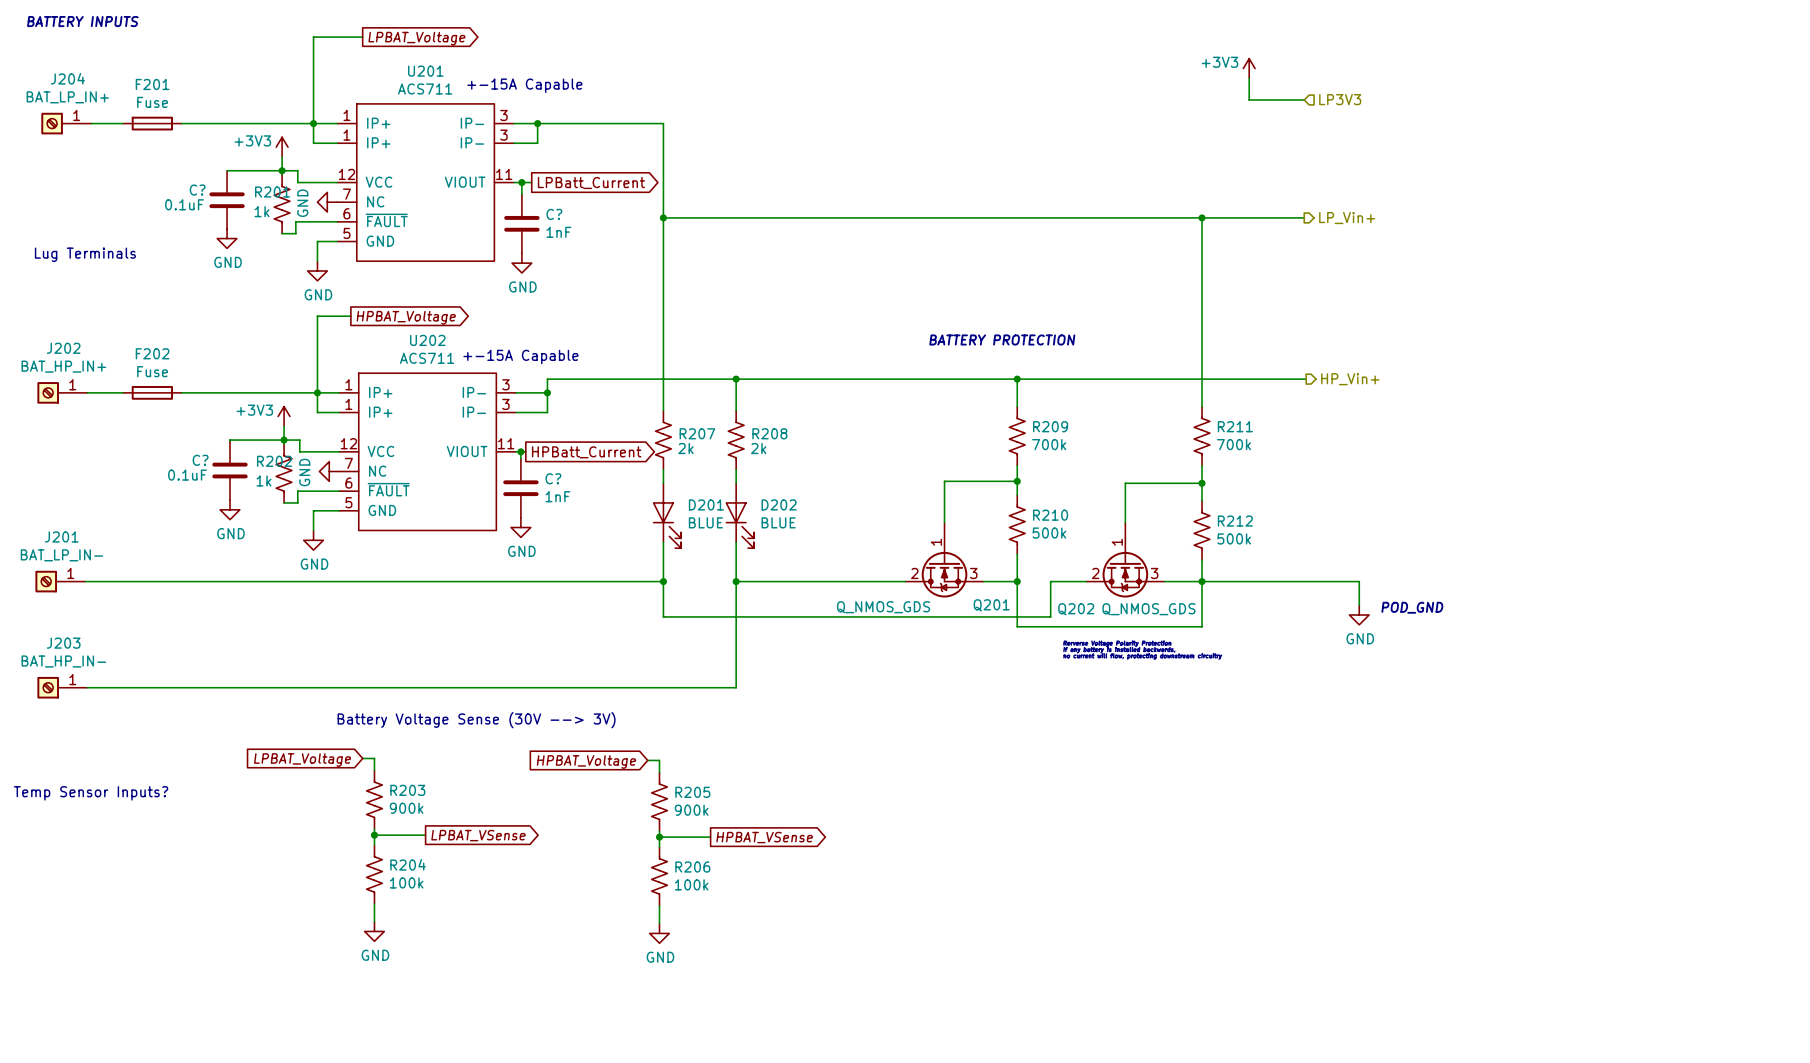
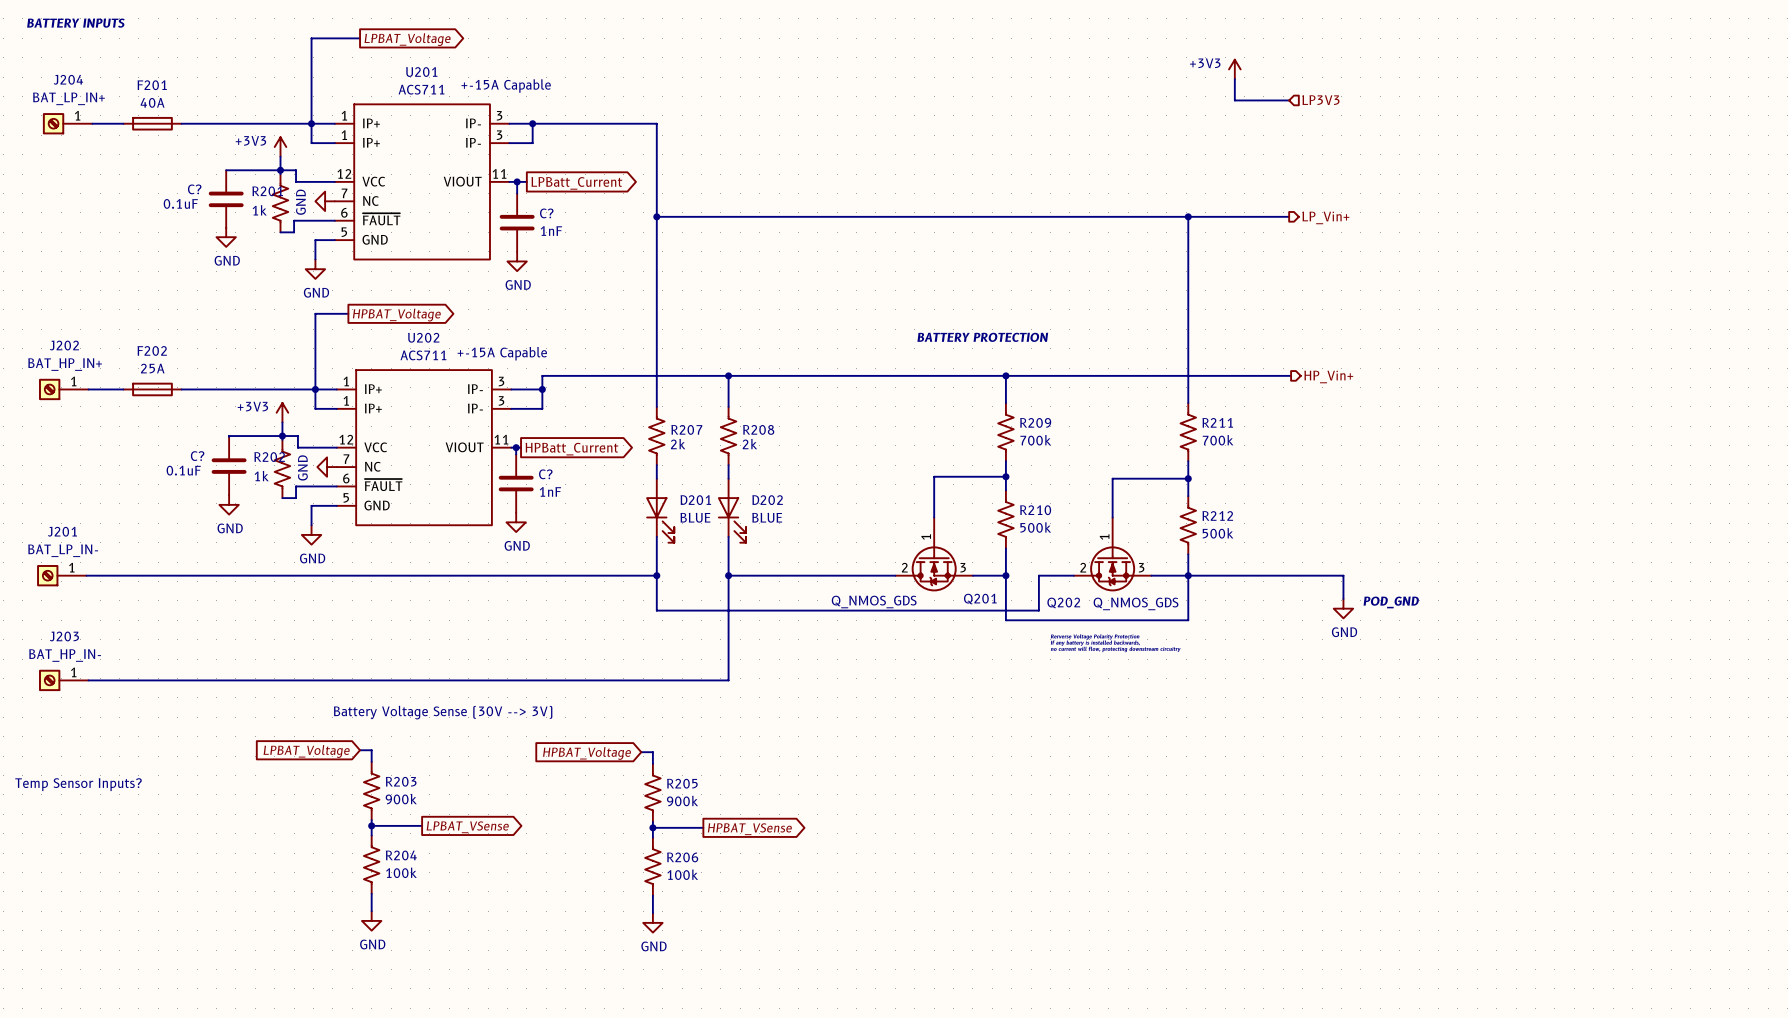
F201 value: Fuse (152, 102) -> 40A (152, 102)
text: Lug Terminals (85, 254) -> none
F202 value: Fuse (152, 371) -> 25A (152, 368)

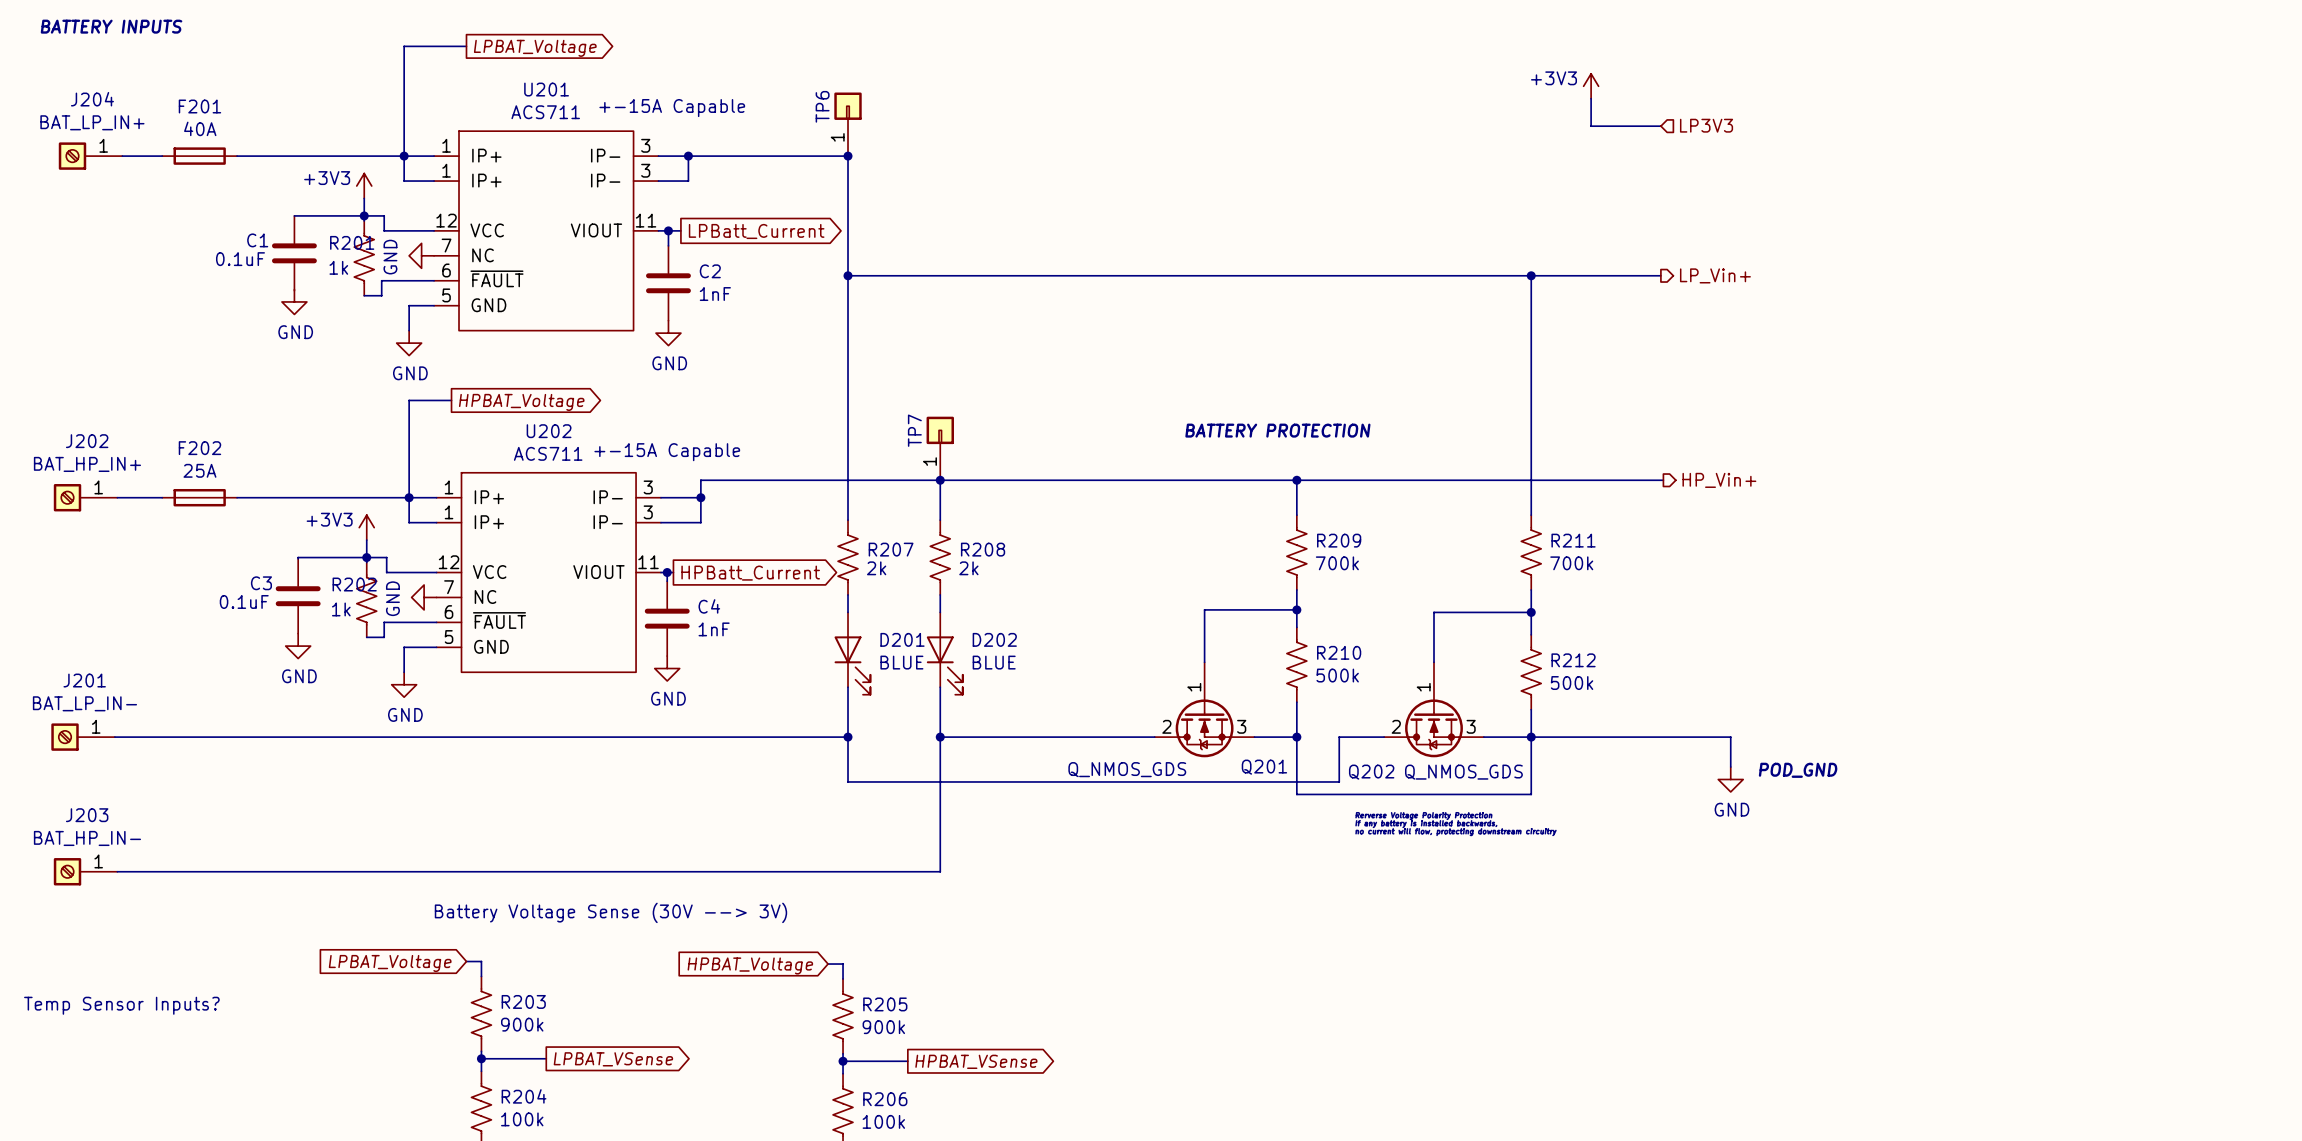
TP6: none -> (848, 124)
junction: none -> (848, 156)
C? name: C? (194, 189) -> C1 (257, 240)
C? name: C? (546, 213) -> C2 (710, 271)
TP7: none -> (940, 448)
C? name: C? (197, 456) -> C3 (261, 583)
C? name: C? (545, 474) -> C4 (709, 606)

